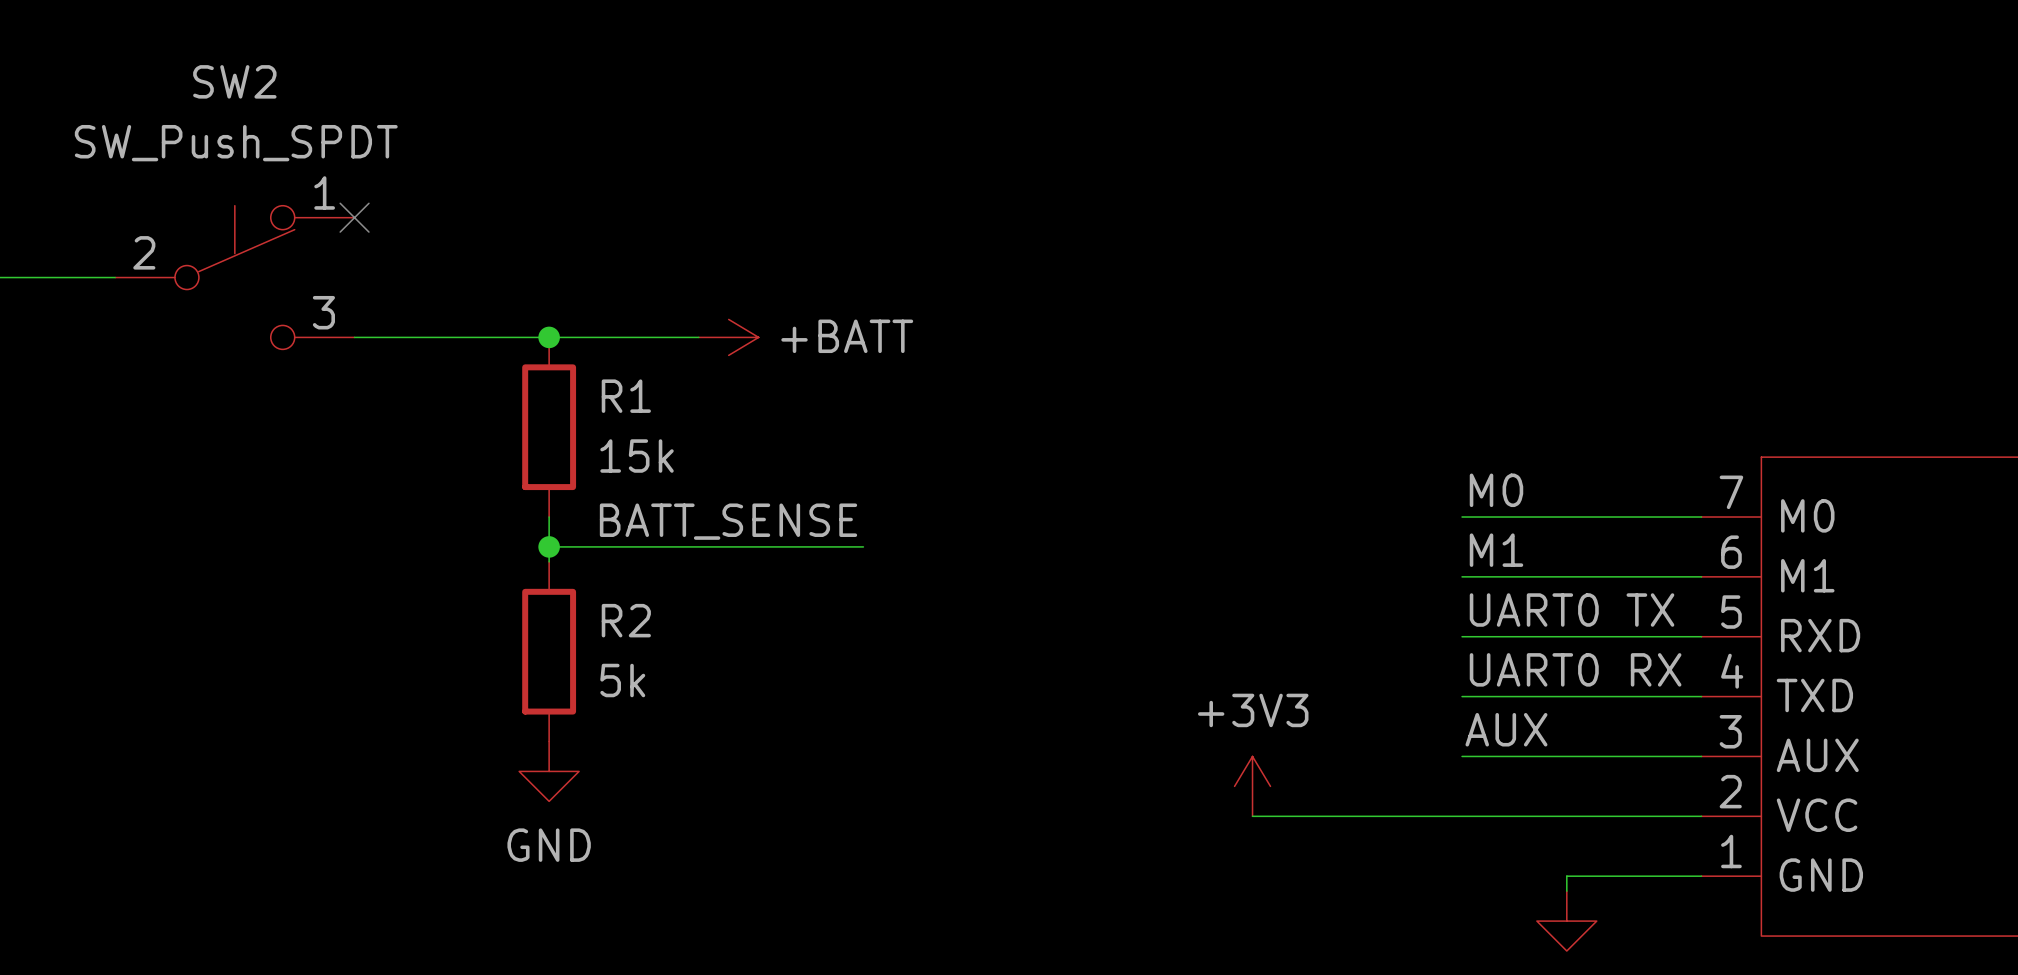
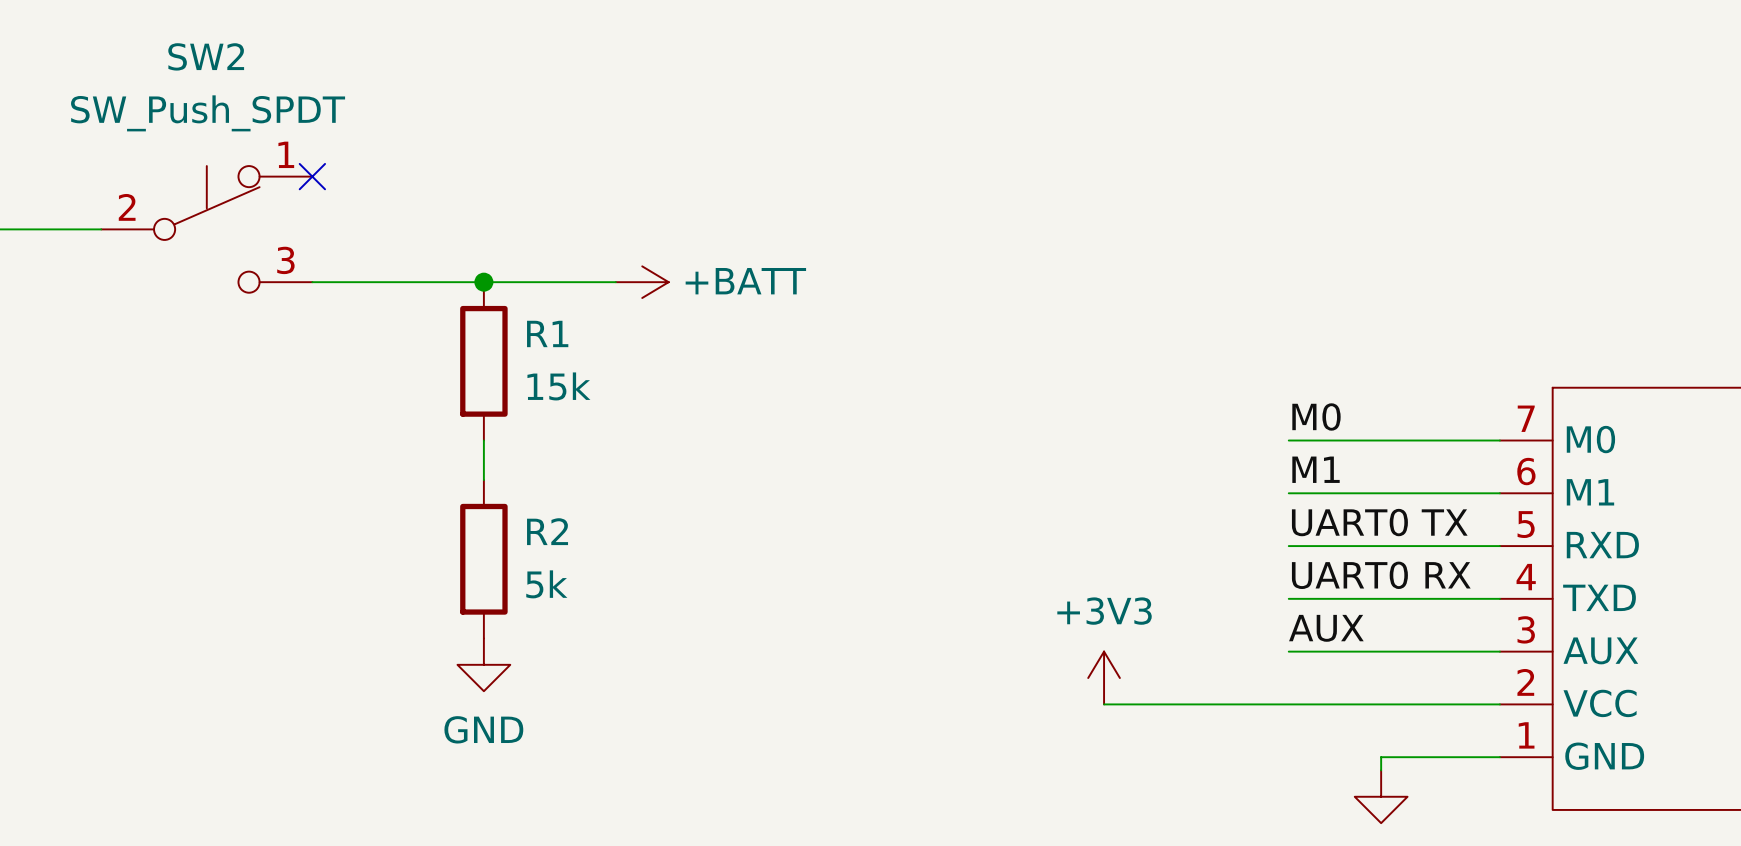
label: BATT_SENSE (728, 521) -> none
wire: (549, 546) (863, 546) -> none
junction: (549, 546) -> none

